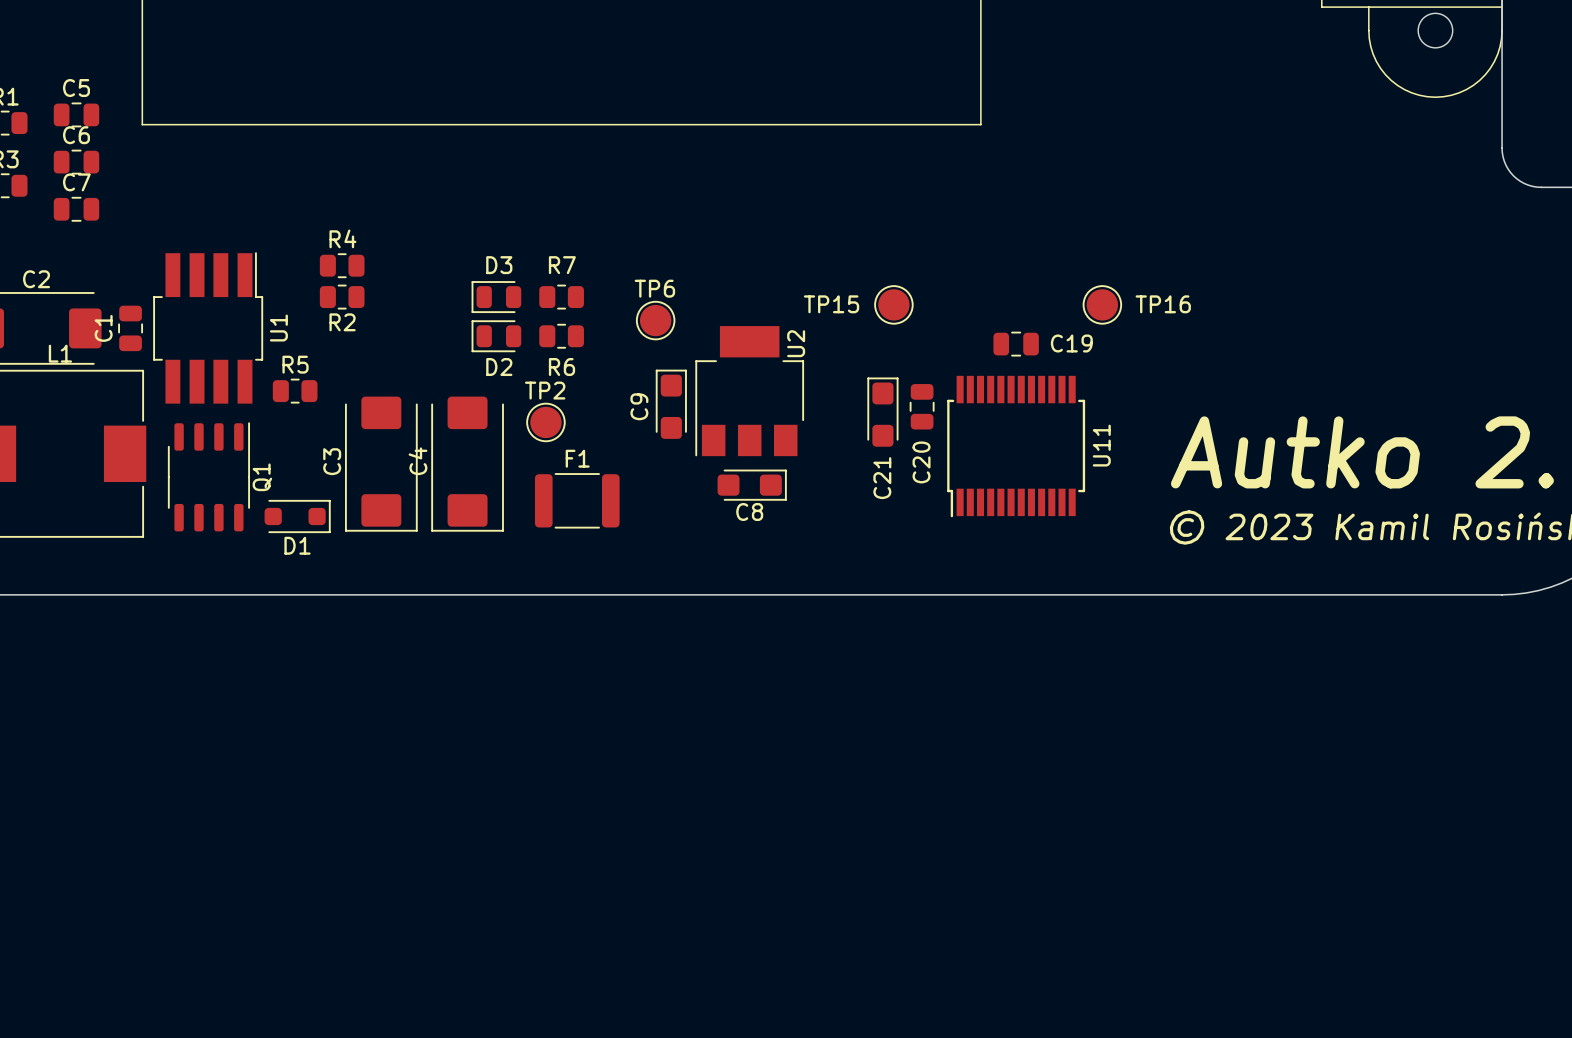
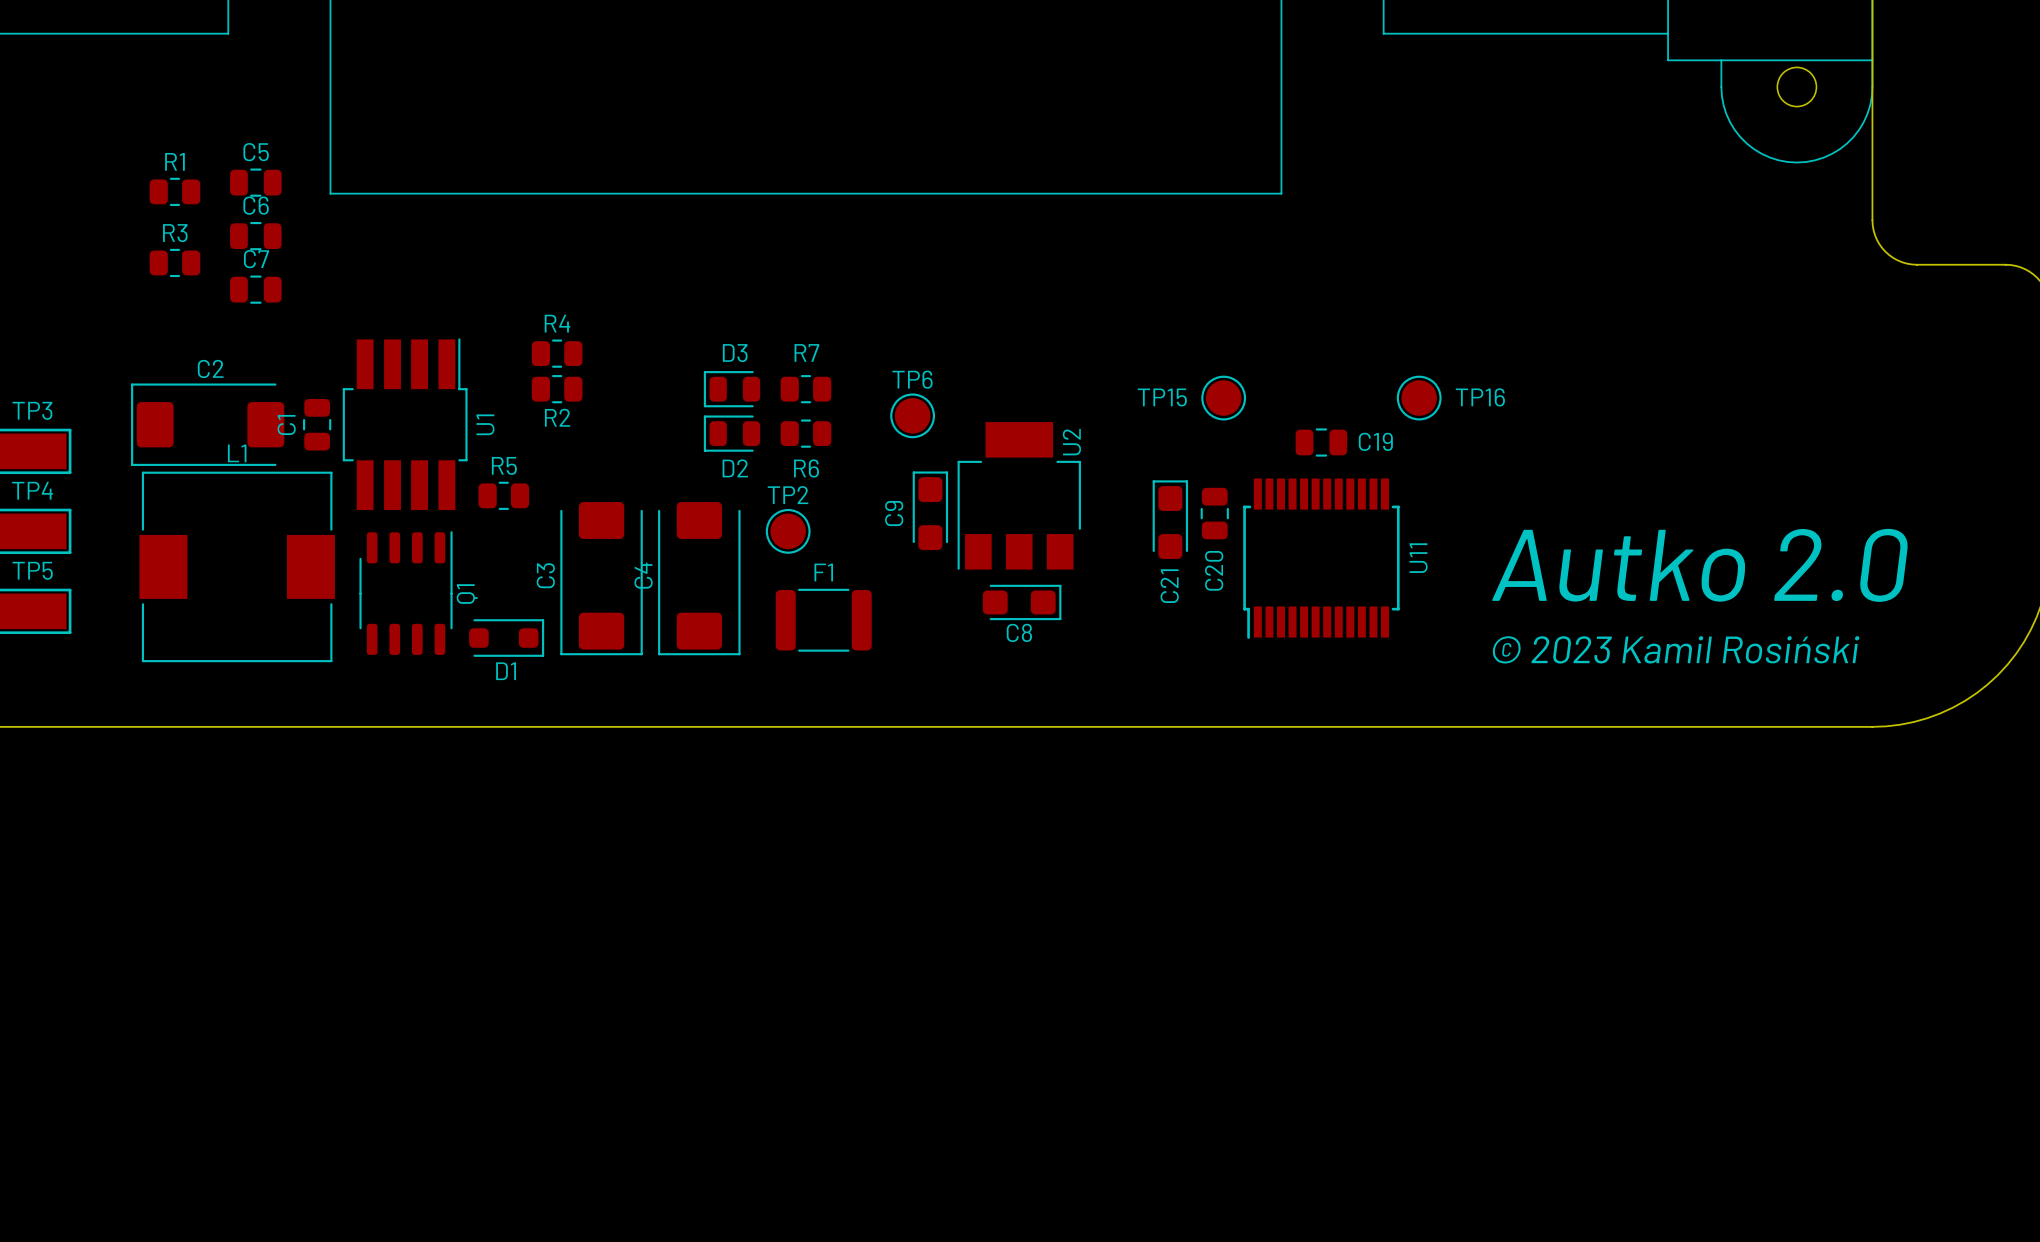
TP15 position: (893, 304) -> (1223, 398)

